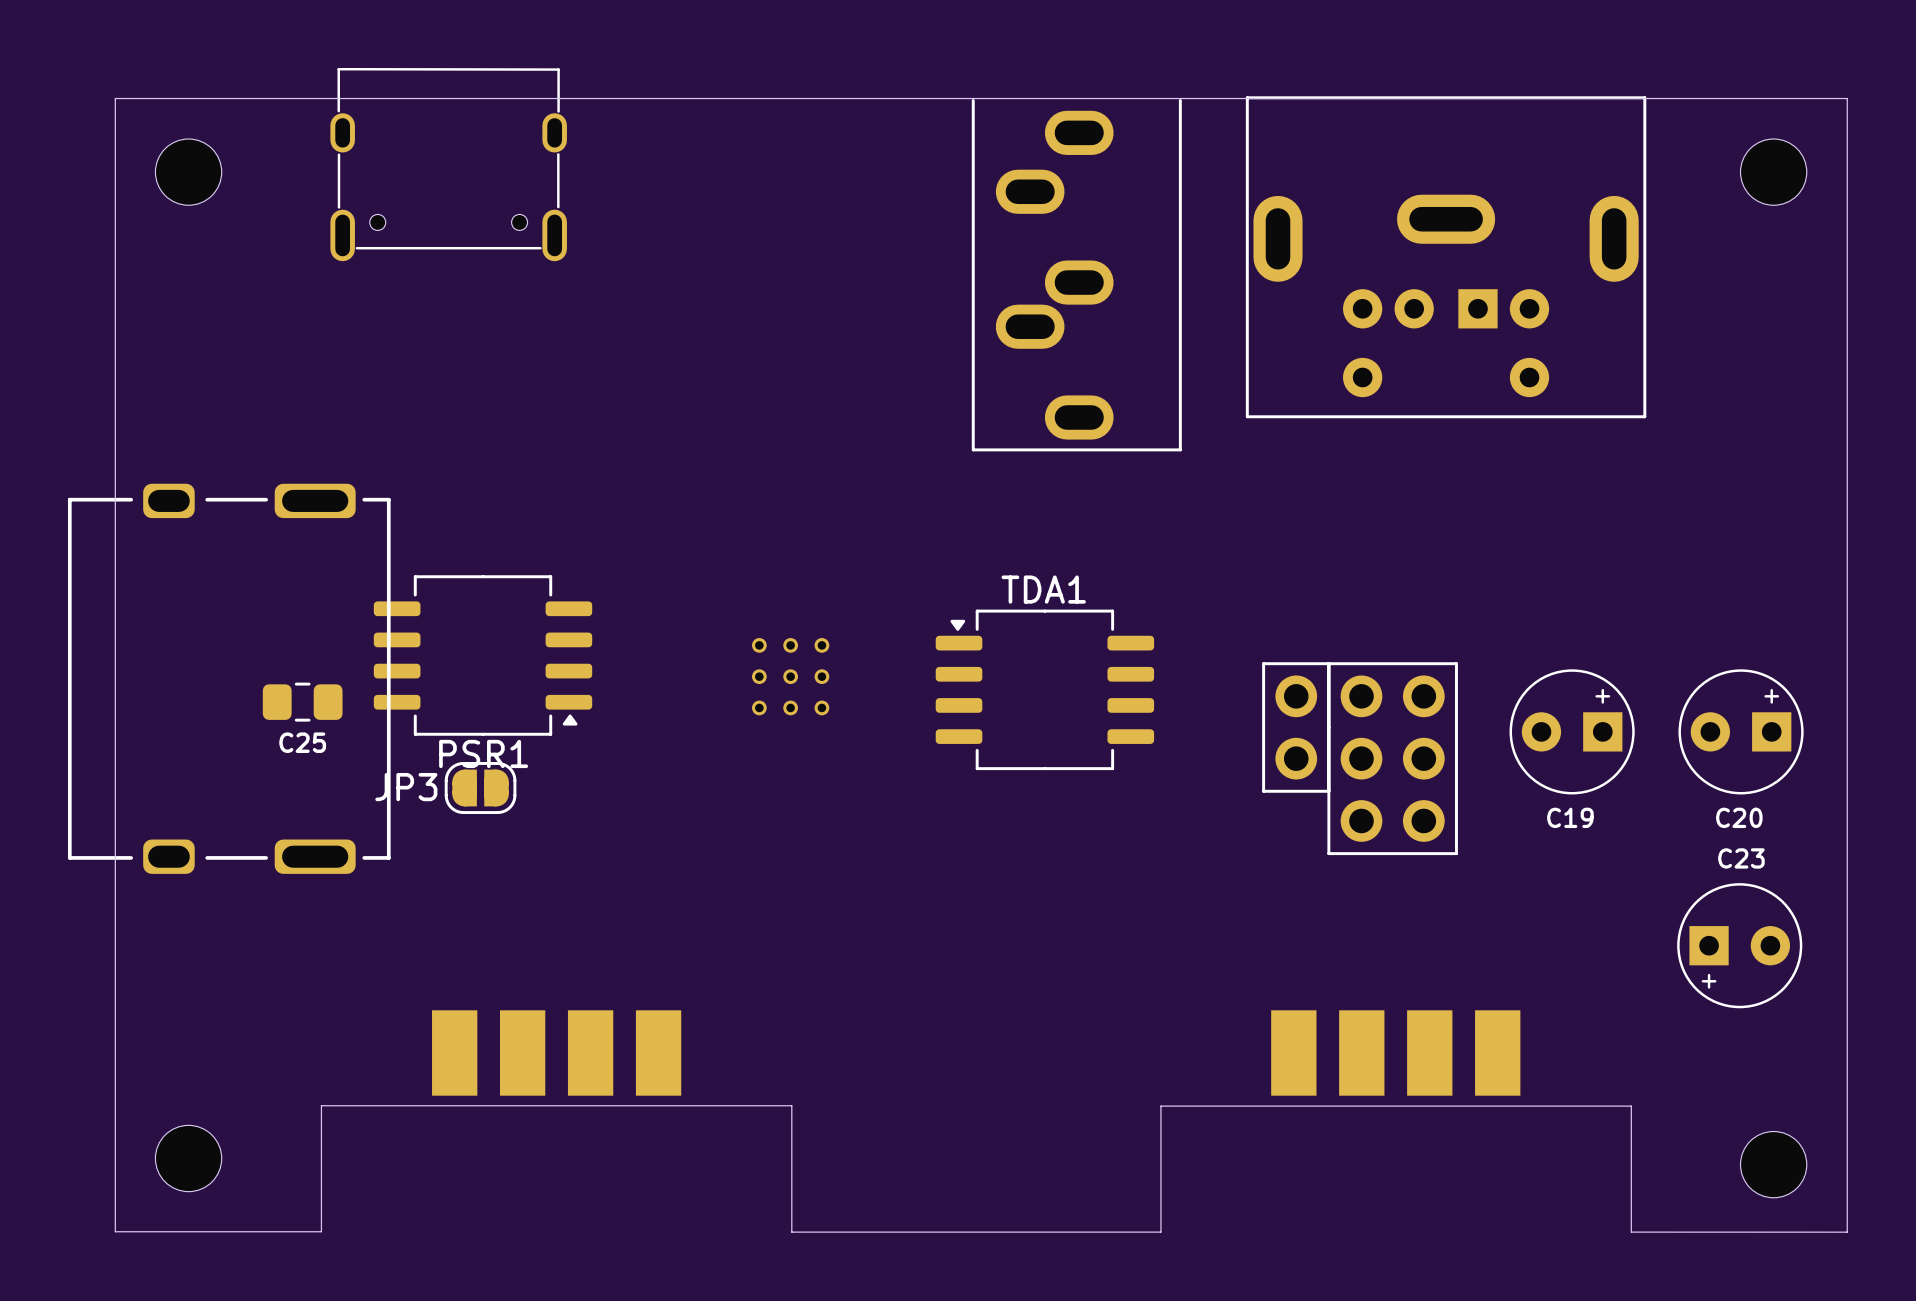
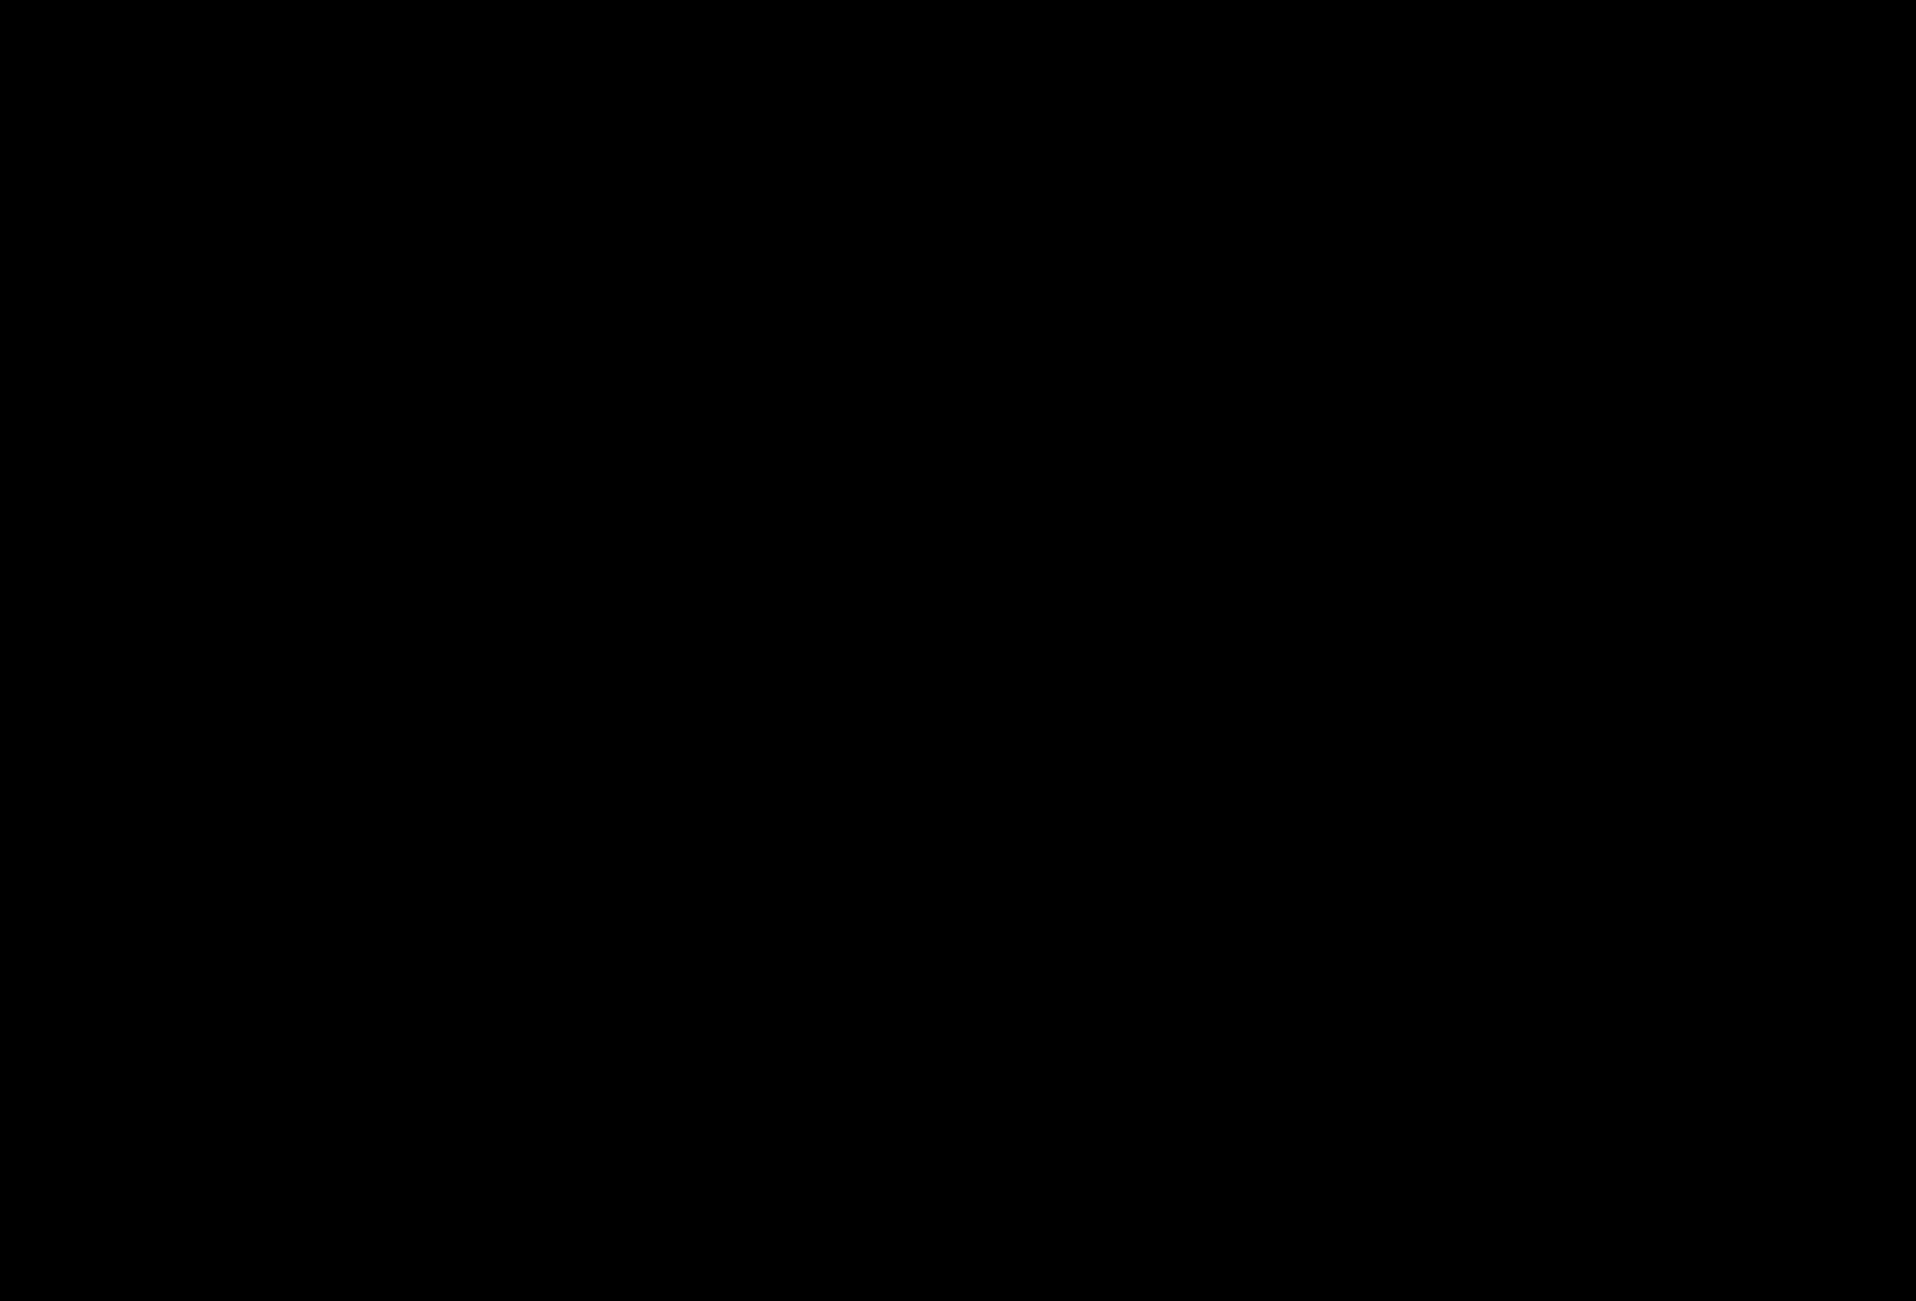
board edge: (1847, 98) (1847, 1232) (1631, 1232) (1631, 1106) (1160, 1106) (1160, 1232) (791, 1232) (791, 1105) (321, 1105) (321, 1231) (115, 1231) (115, 98) (1847, 98) -> none
part: (448, 164) -> none
part: (188, 172) -> none
part: (1773, 172) -> none
part: (1446, 257) -> none
part: (1076, 275) -> none
PSR1: (483, 655) -> none
part: (790, 676) -> none
part: (229, 678) -> none
TDA1: (1044, 689) -> none
C25: (302, 702) -> none
part: (1296, 727) -> none
C19: (1572, 731) -> none
C20: (1741, 731) -> none
part: (1392, 758) -> none
JP3: (480, 788) -> none
C23: (1739, 945) -> none
part: (556, 1052) -> none
part: (1395, 1052) -> none
part: (188, 1158) -> none
part: (1773, 1164) -> none

